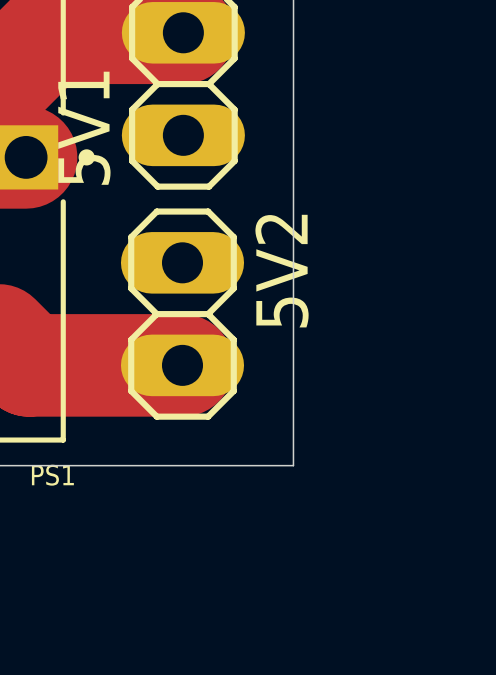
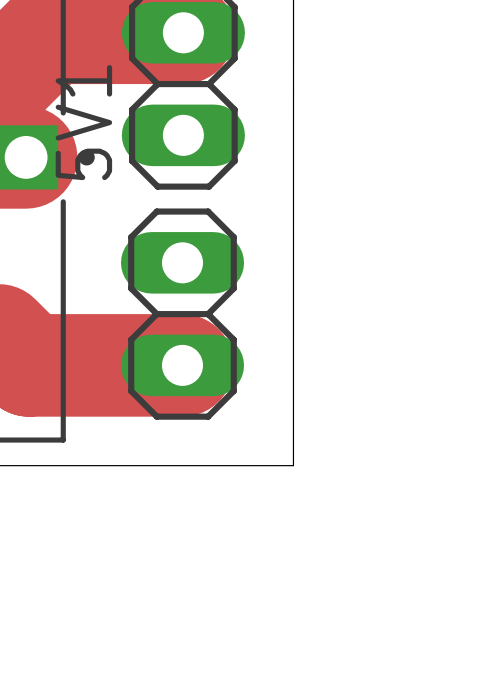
5V2 name: 5V2 (282, 271) -> none
PS1 name: PS1 (52, 475) -> none

